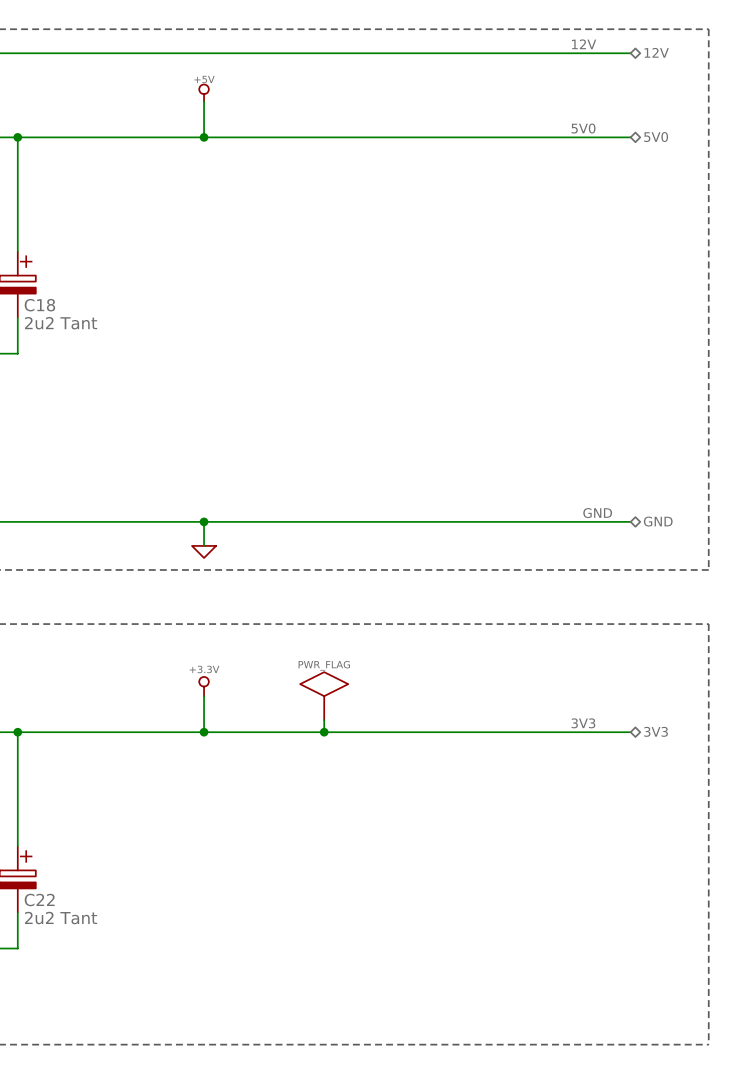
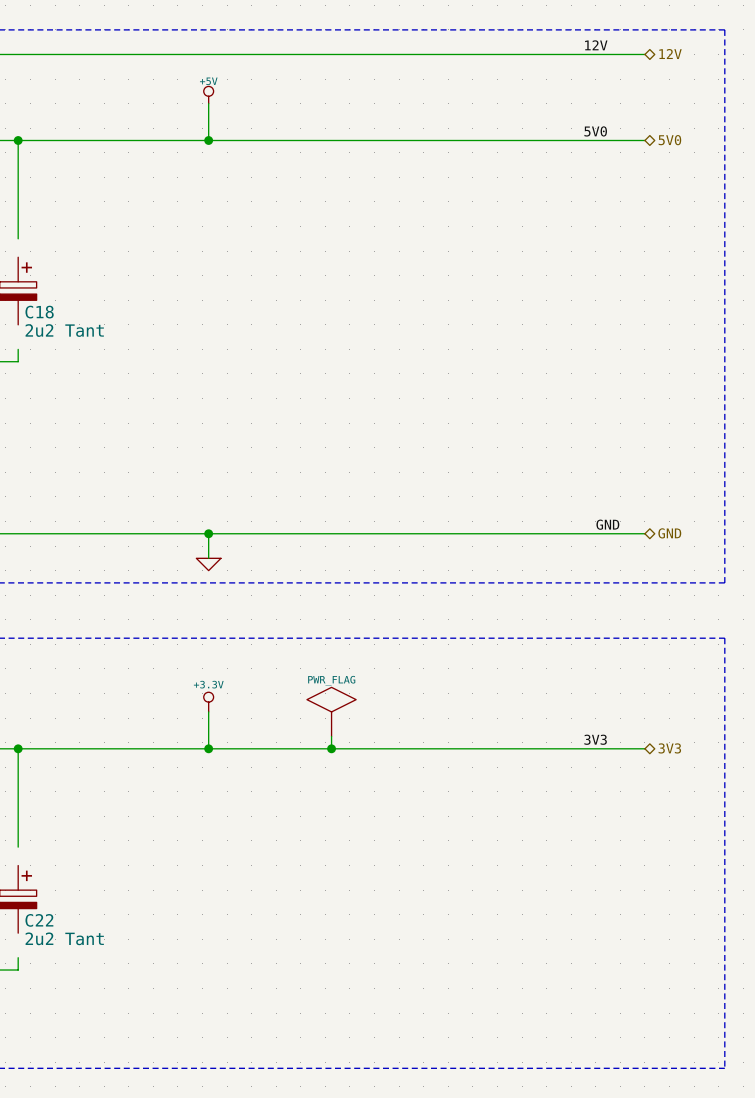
wire: (17, 233) (17, 251) -> none
wire: (17, 317) (17, 341) -> none
wire: (17, 828) (17, 846) -> none
wire: (17, 912) (17, 936) -> none

